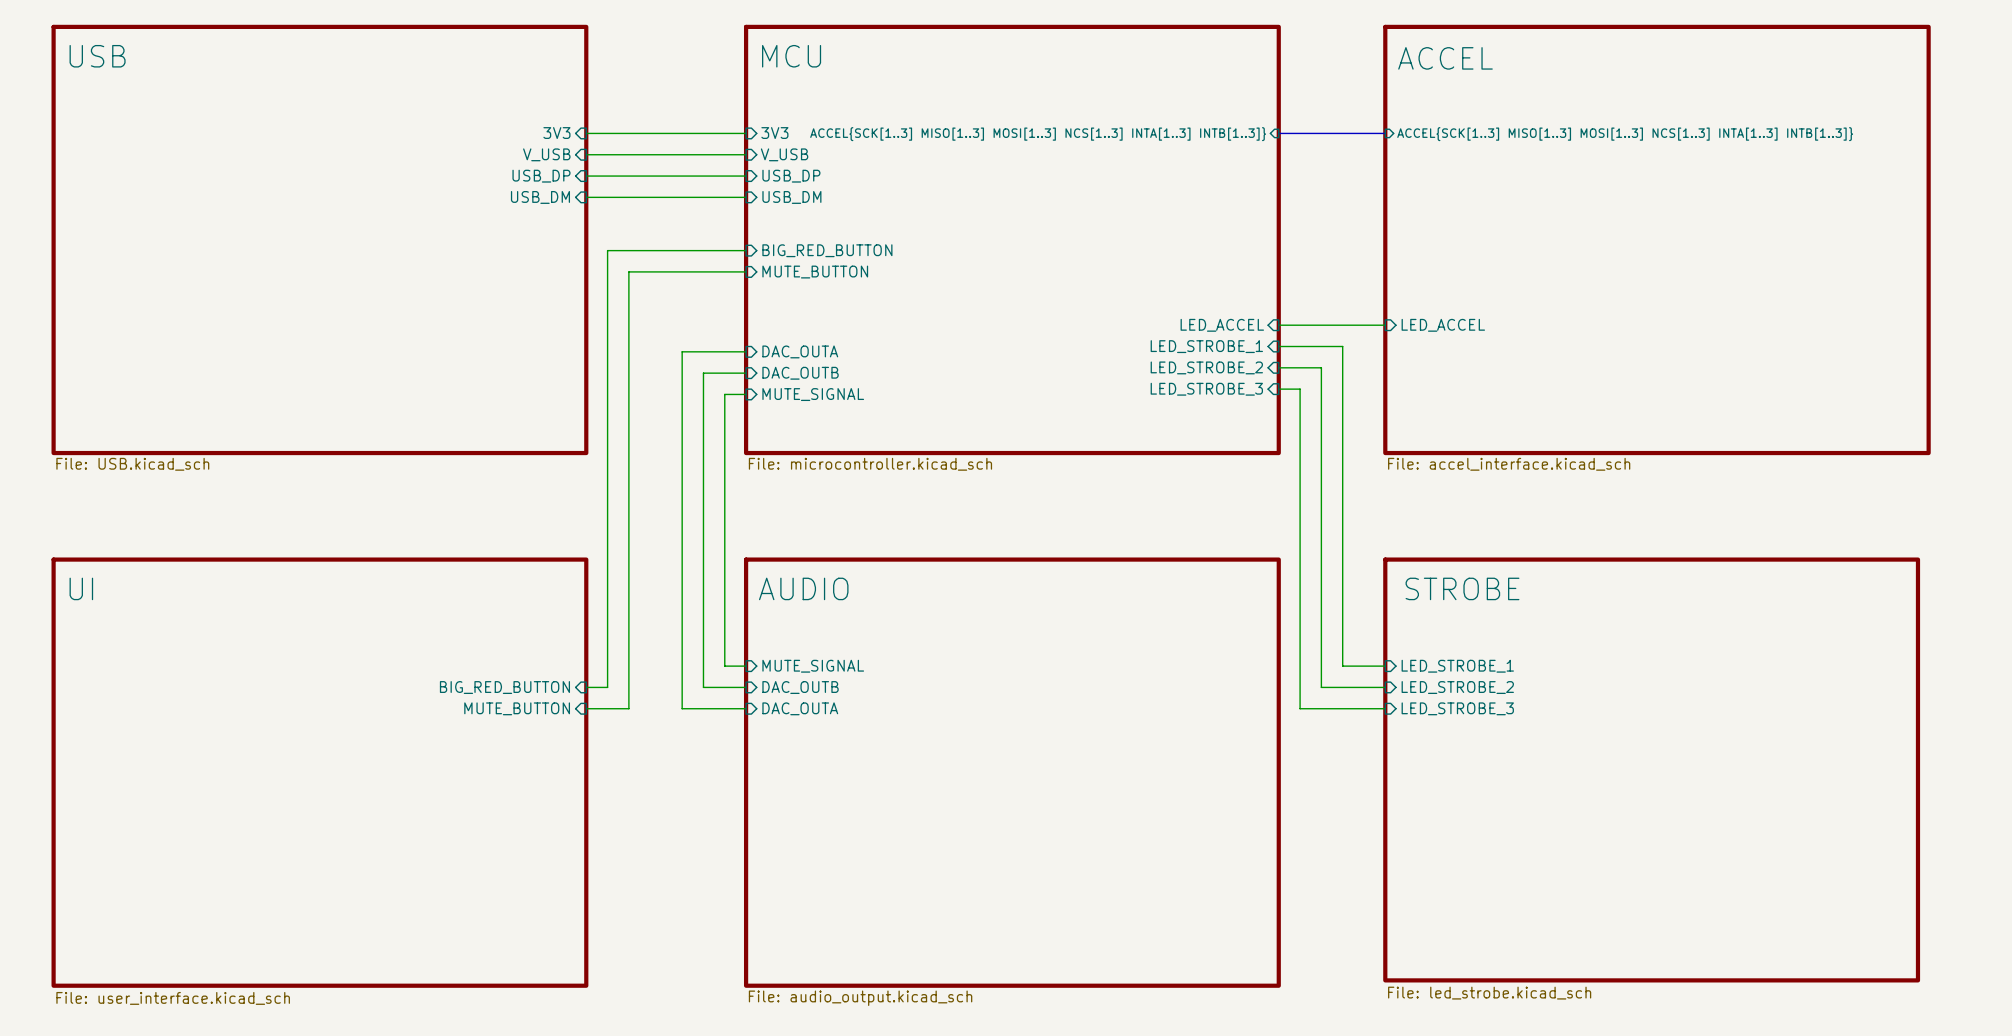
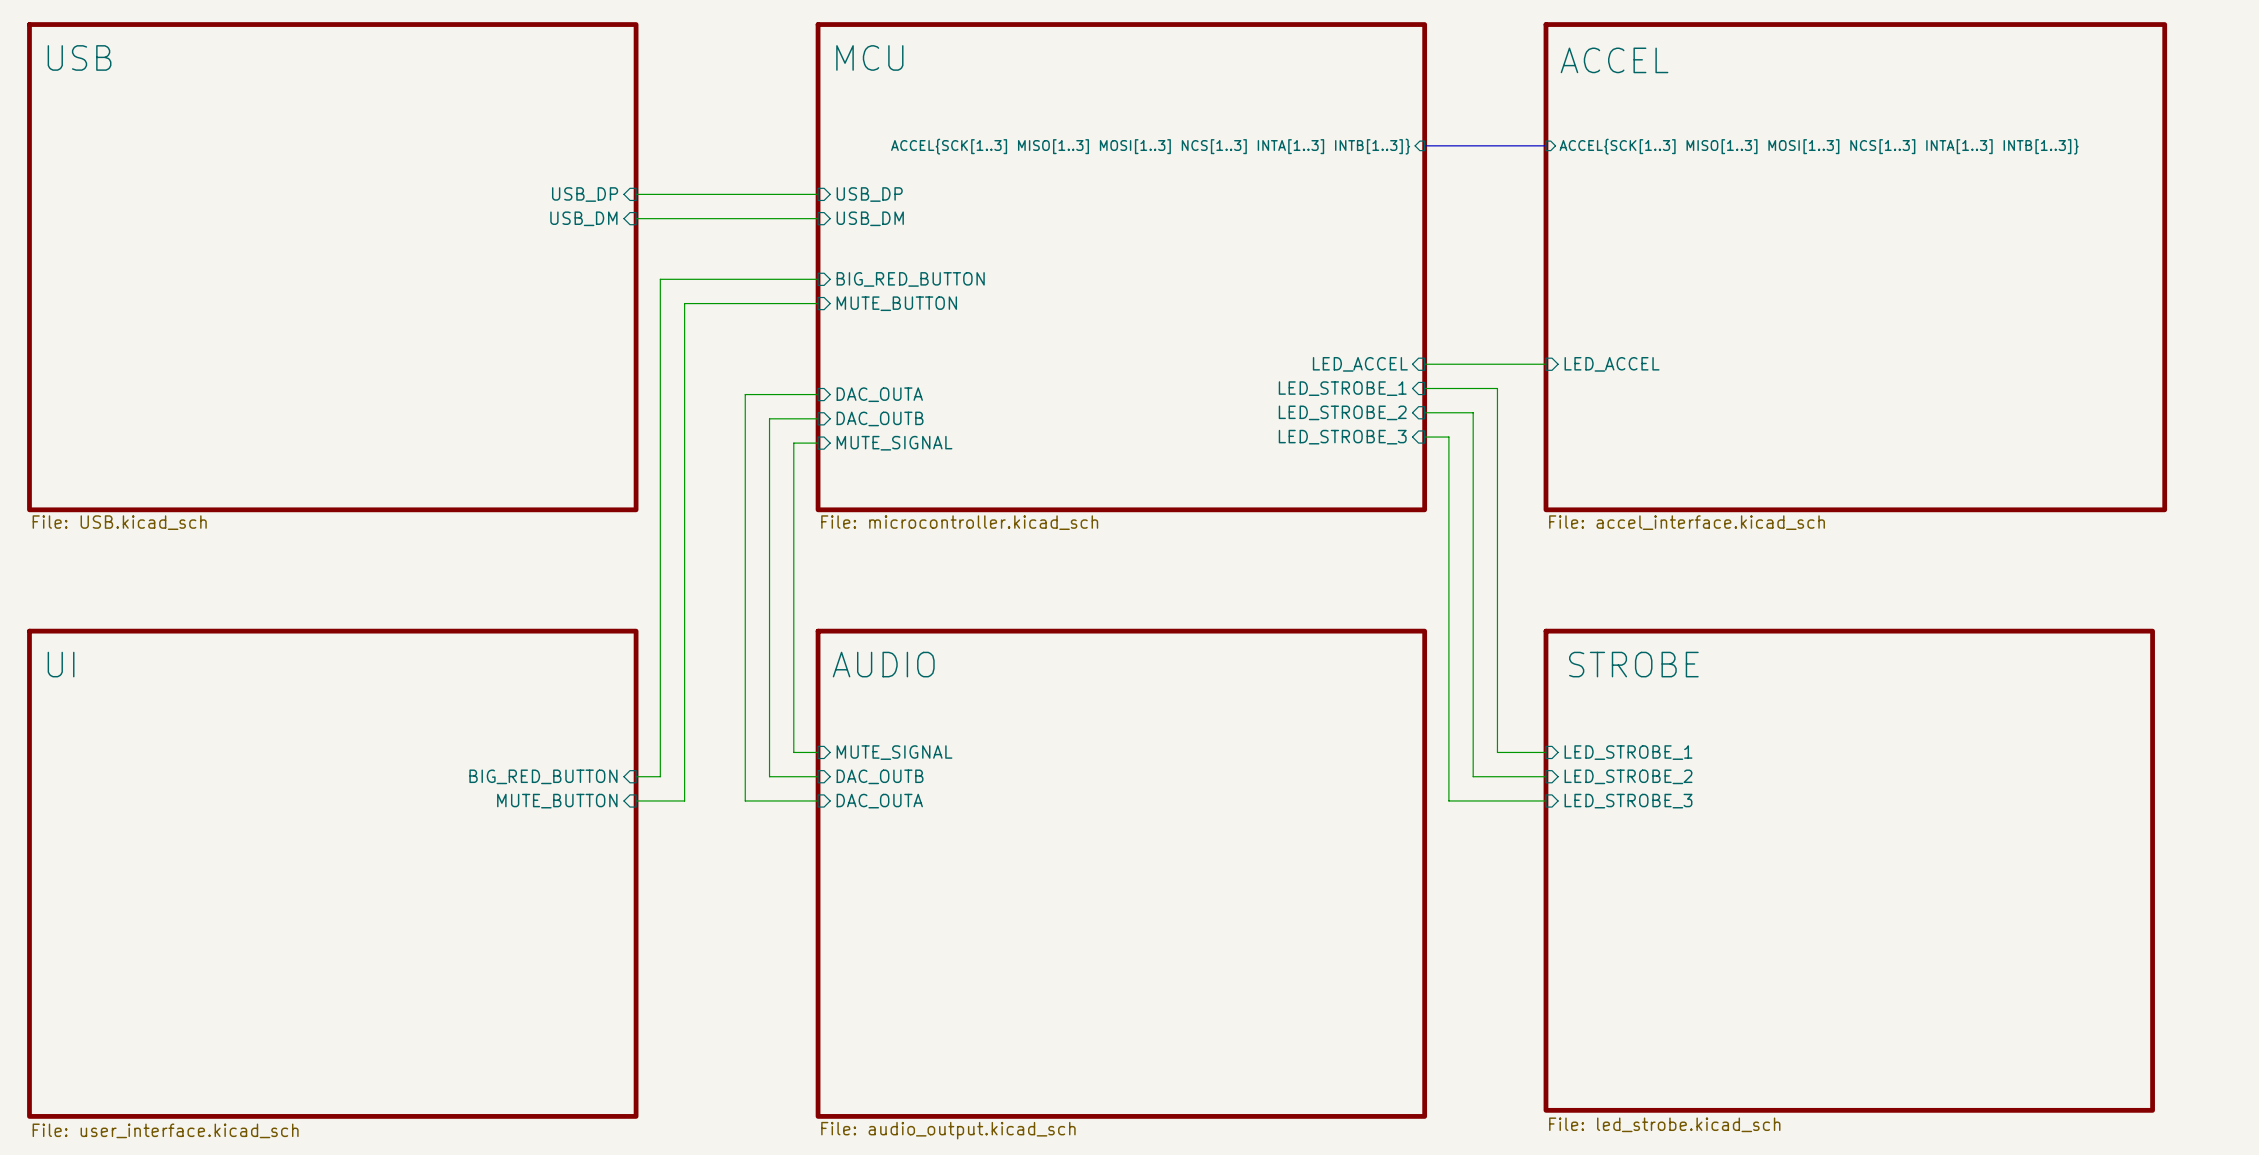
sheet pin: 3V3 (556, 133) -> none
wire: (586, 133) (746, 133) -> none
sheet pin: 3V3 (774, 133) -> none
sheet pin: V_USB (546, 154) -> none
wire: (586, 154) (746, 154) -> none
sheet pin: V_USB (784, 154) -> none

